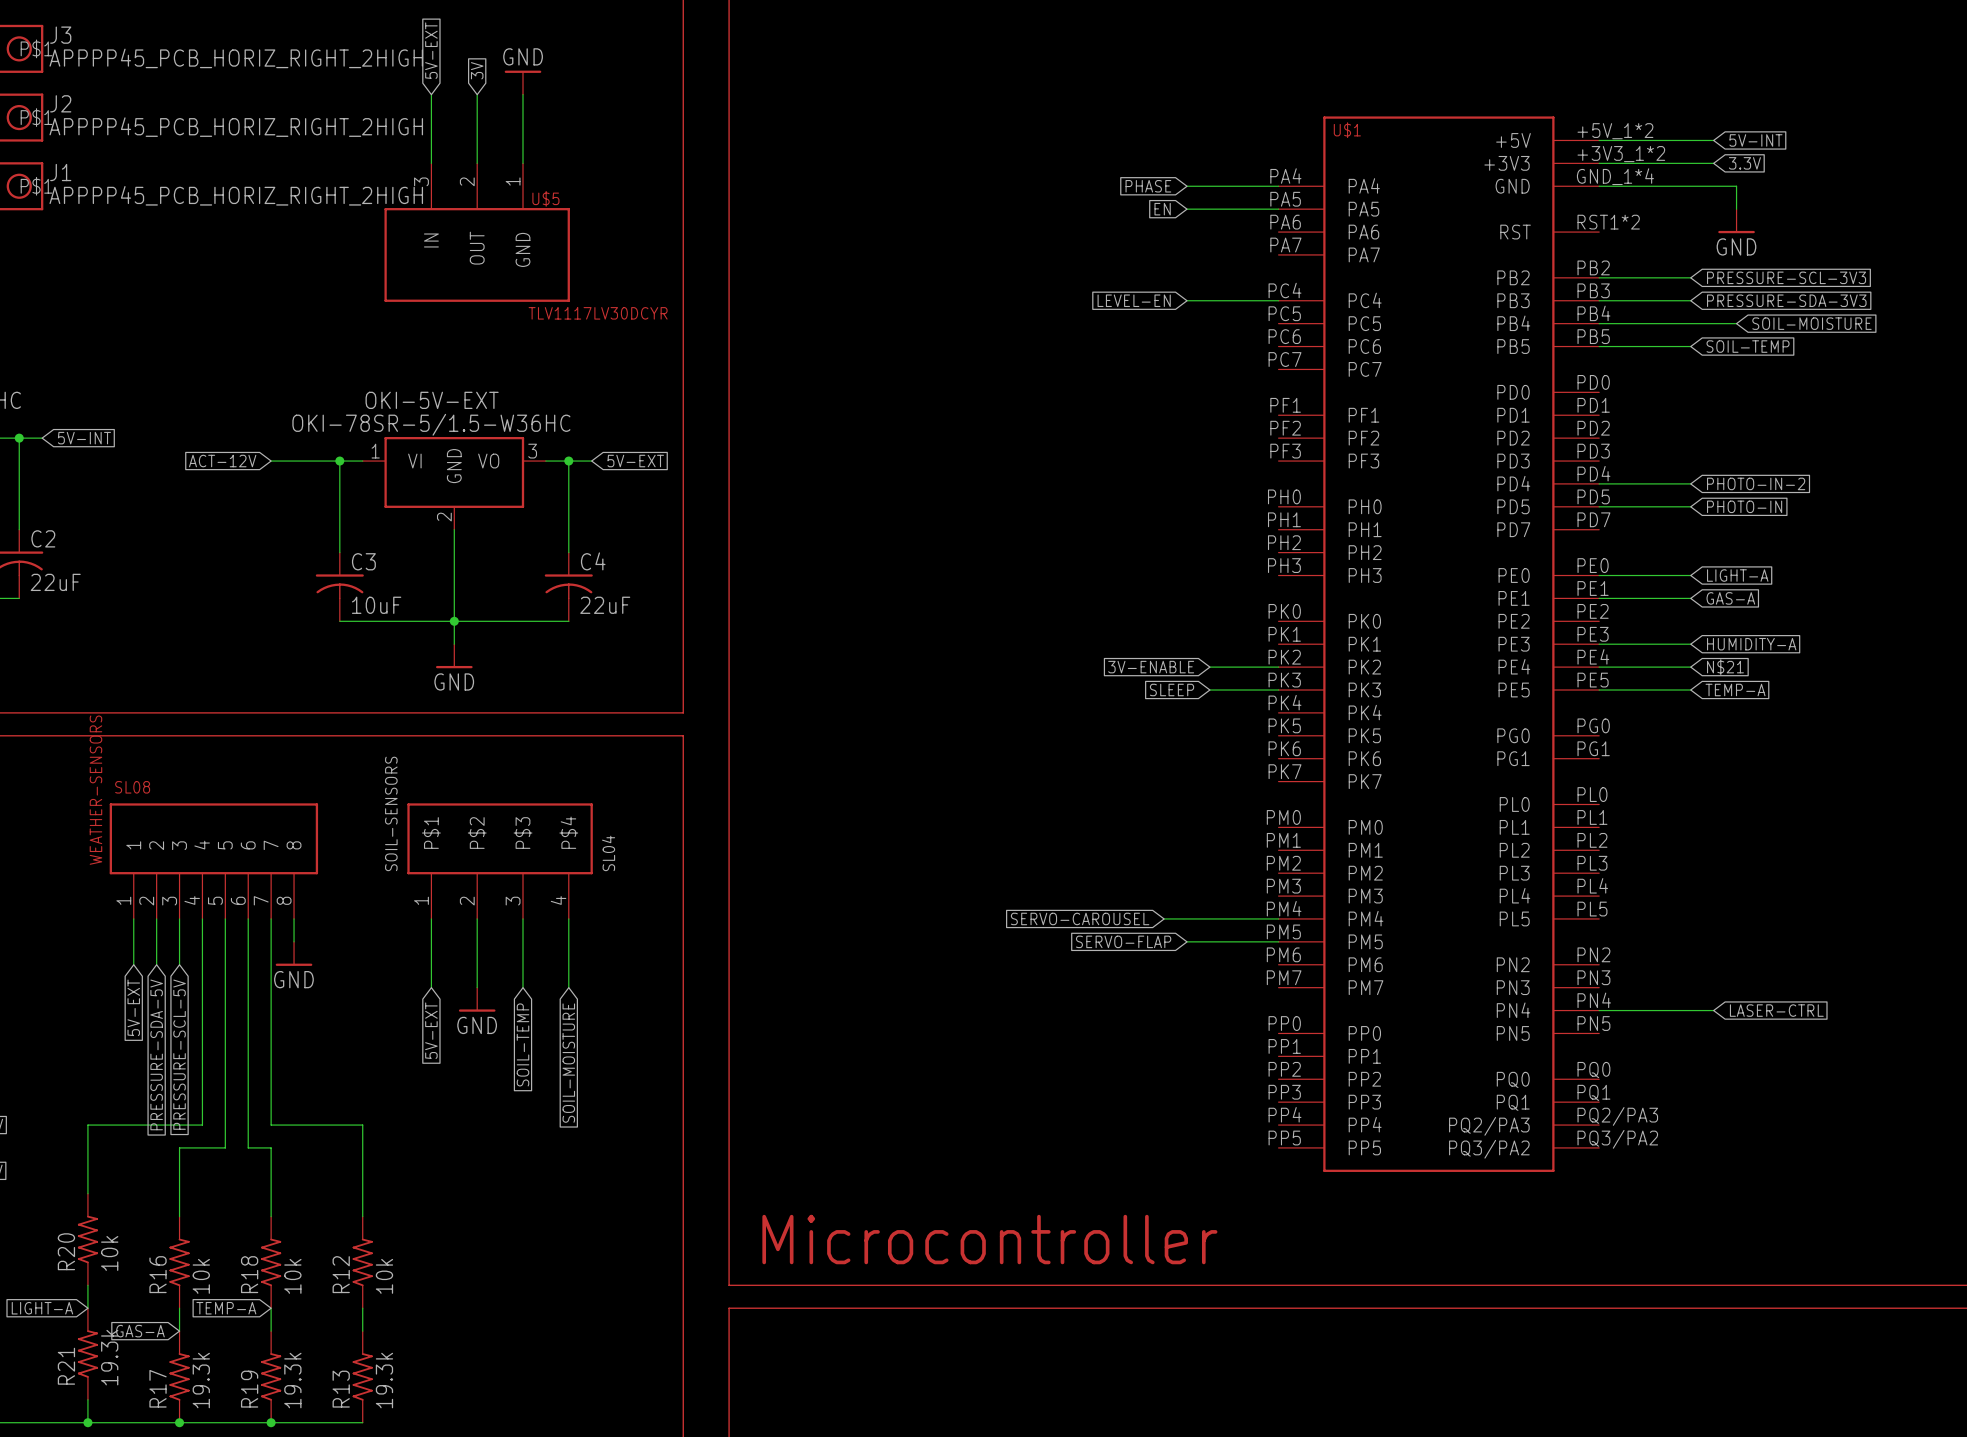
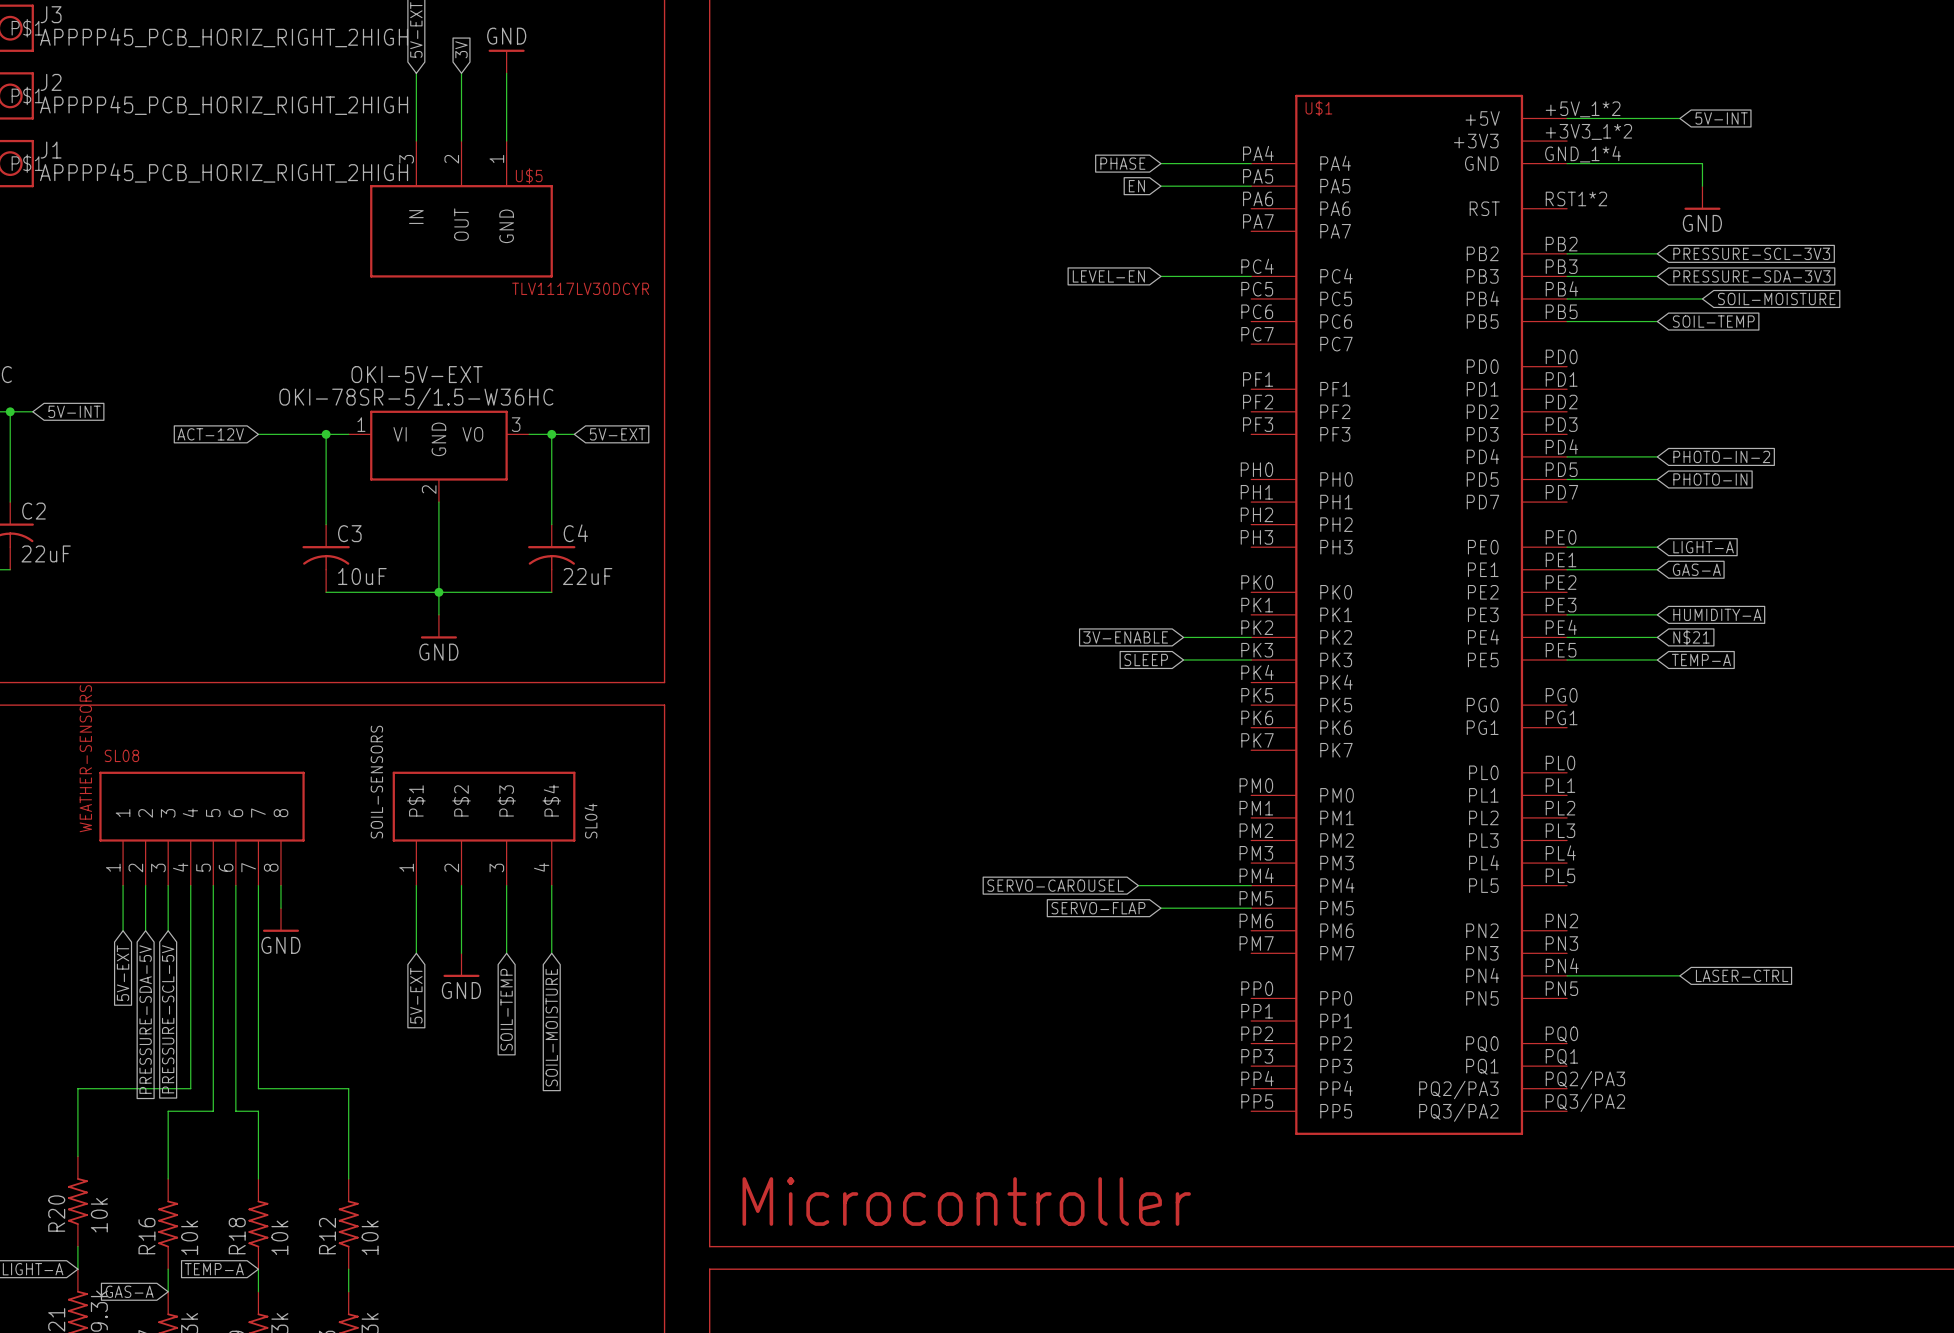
wire: (1599, 163) (1713, 163) -> none
global label: 3.3V (1744, 163) -> none

